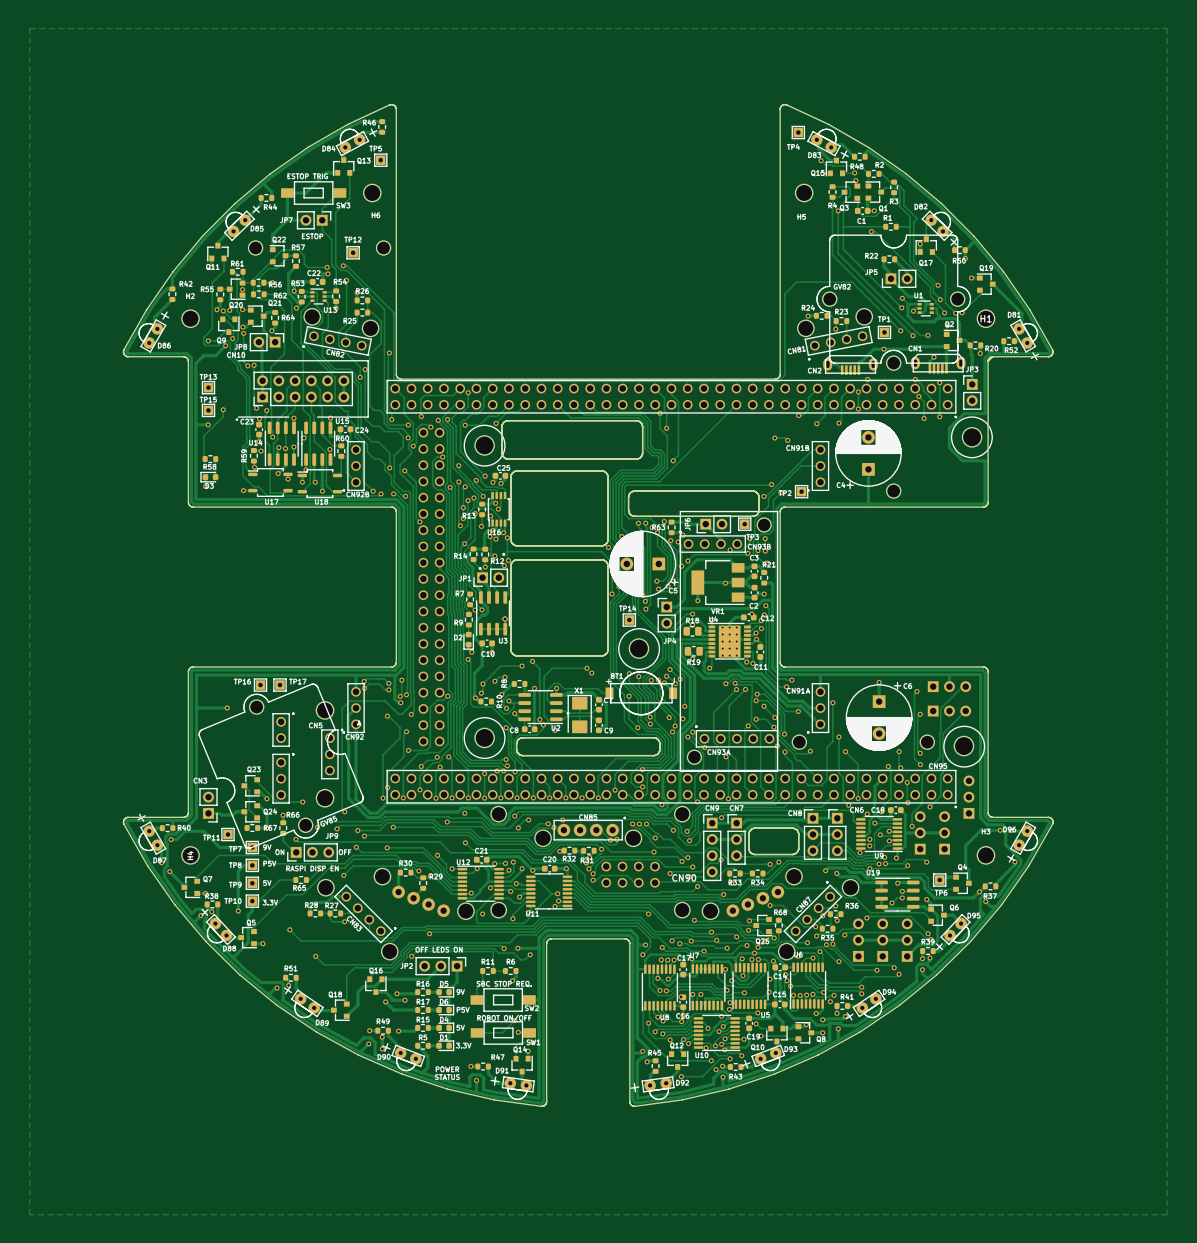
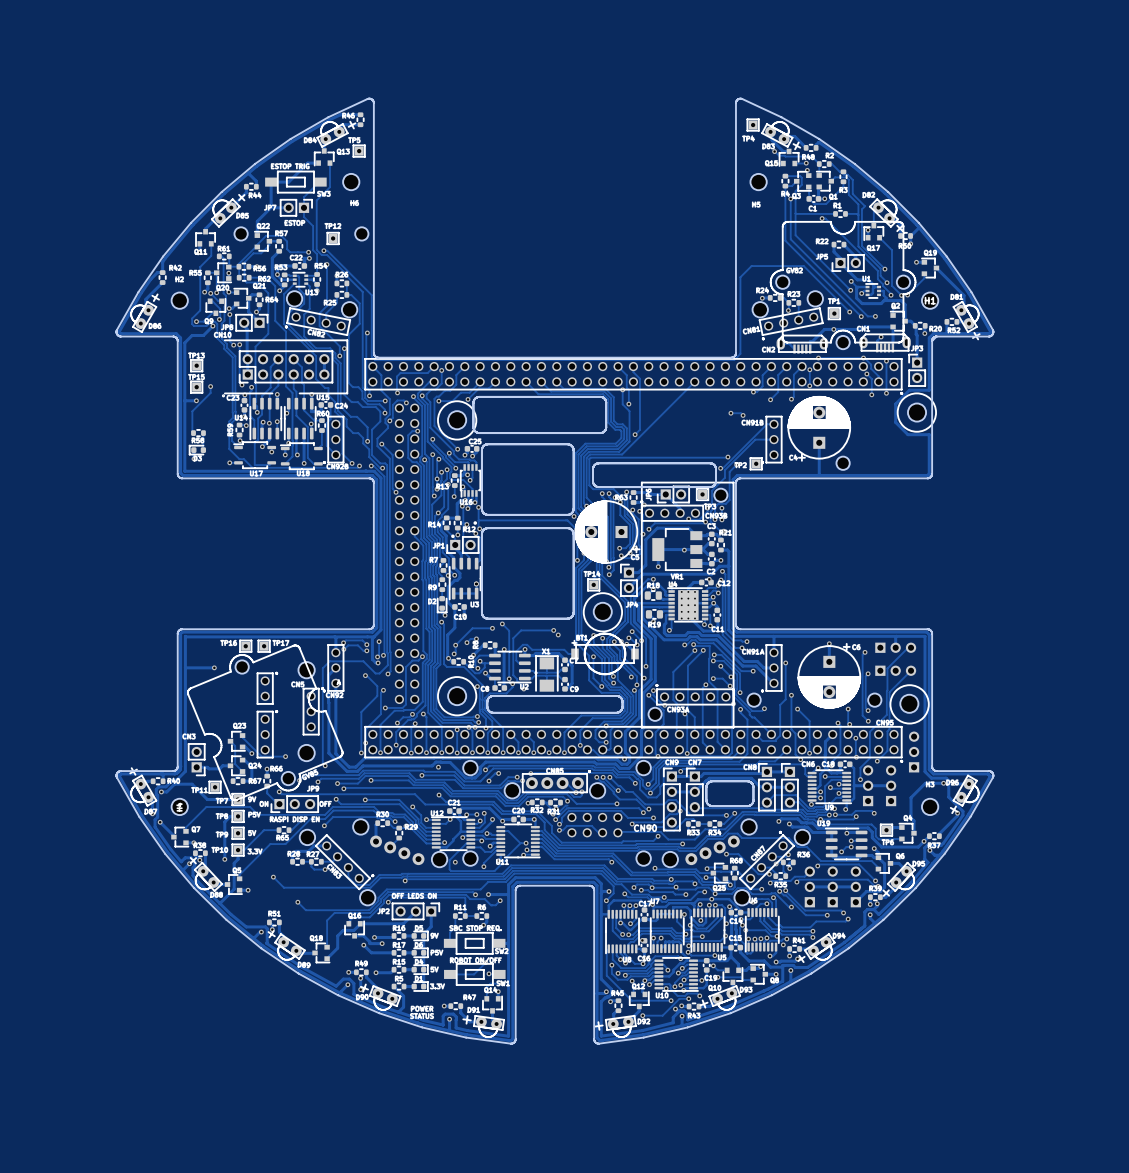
zone outline: (29, 28) (29, 1214) (1167, 1214) (1167, 28) (29, 28) -> none

